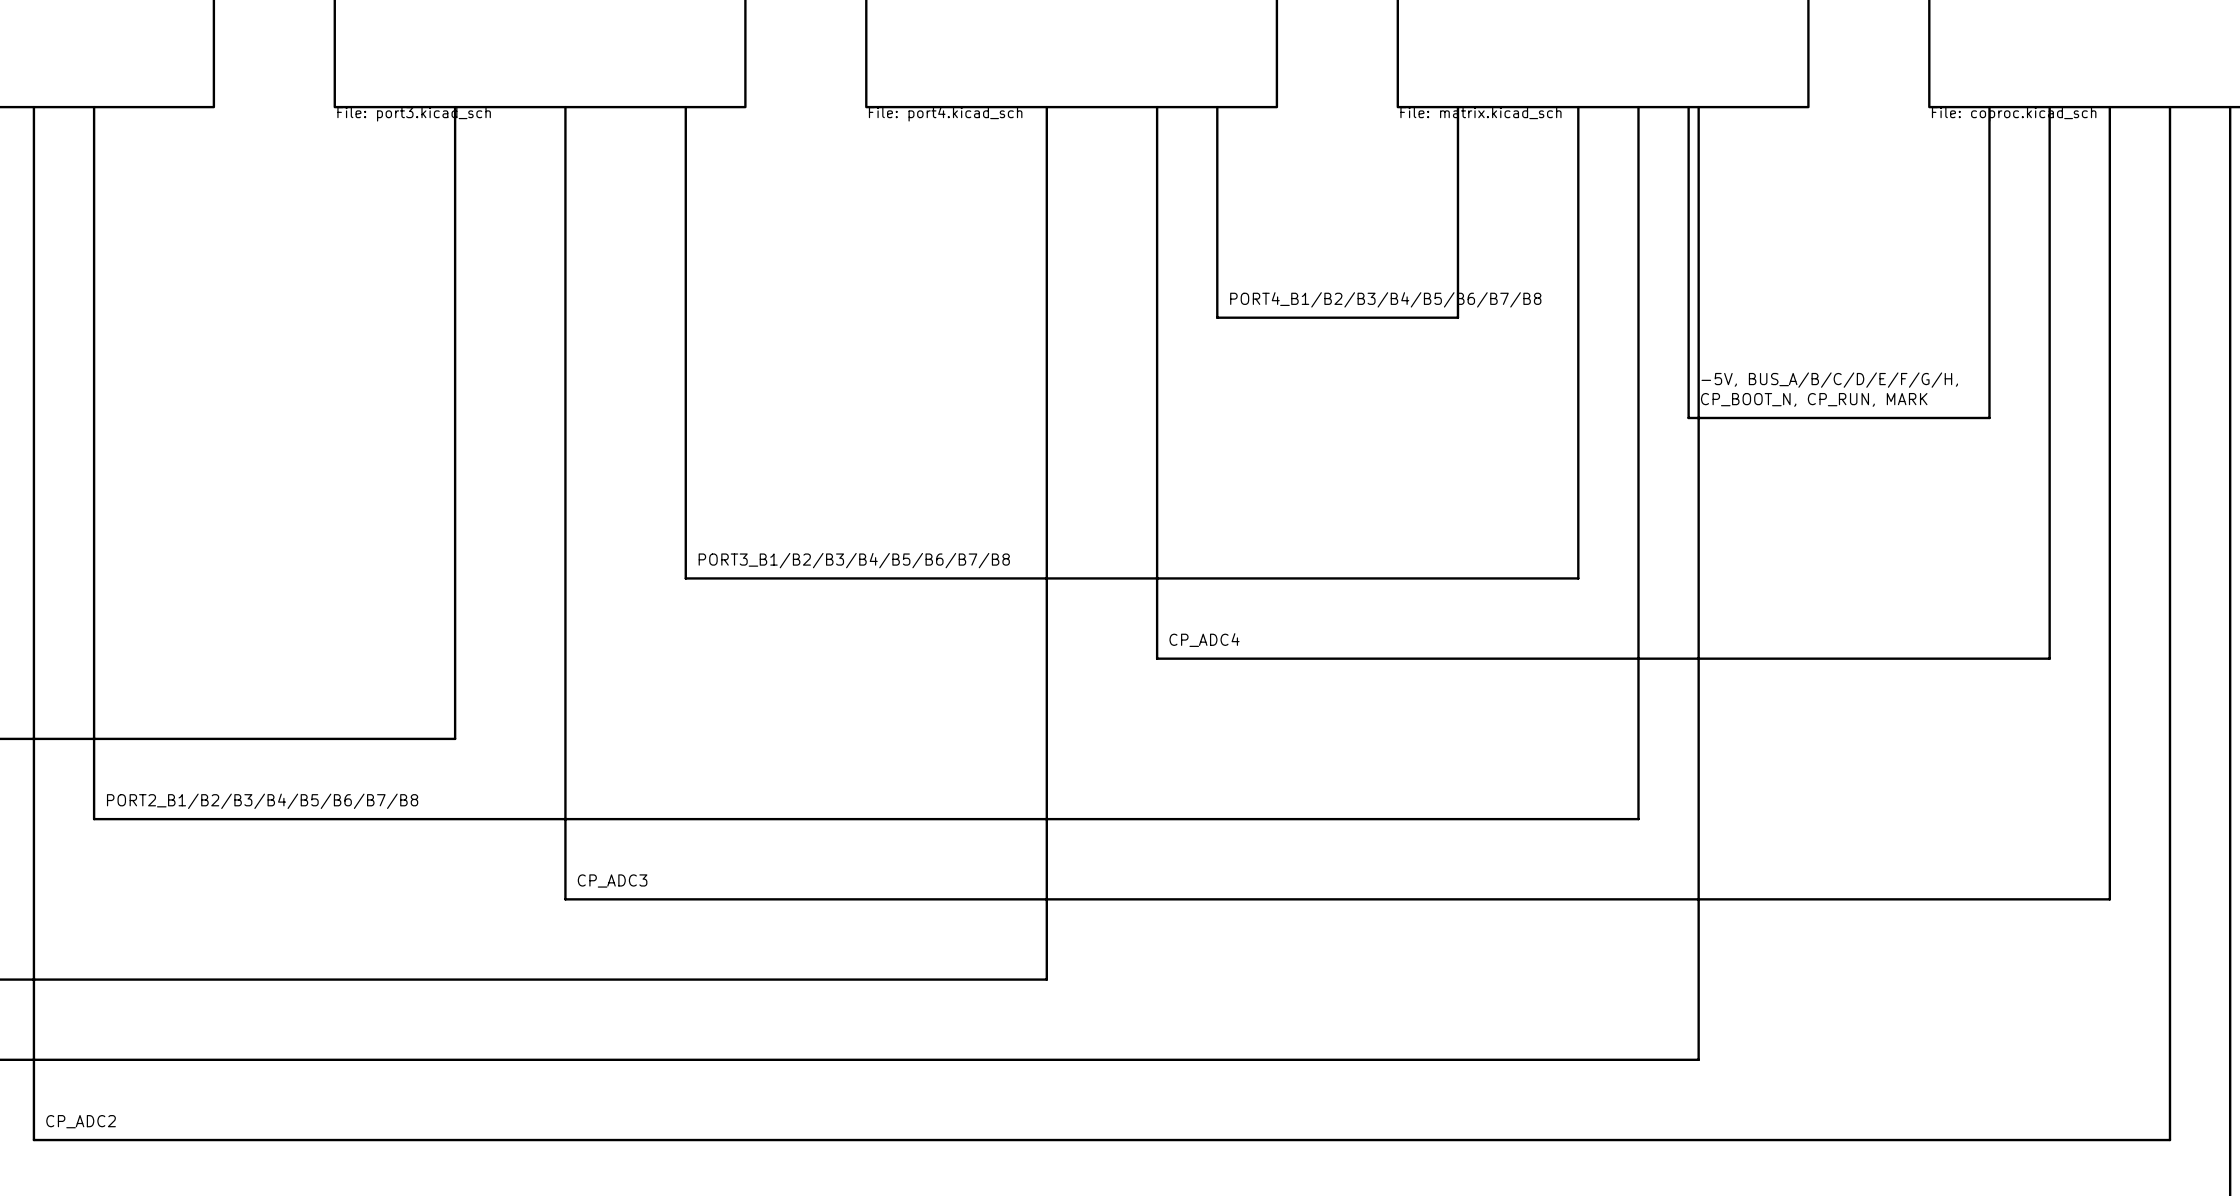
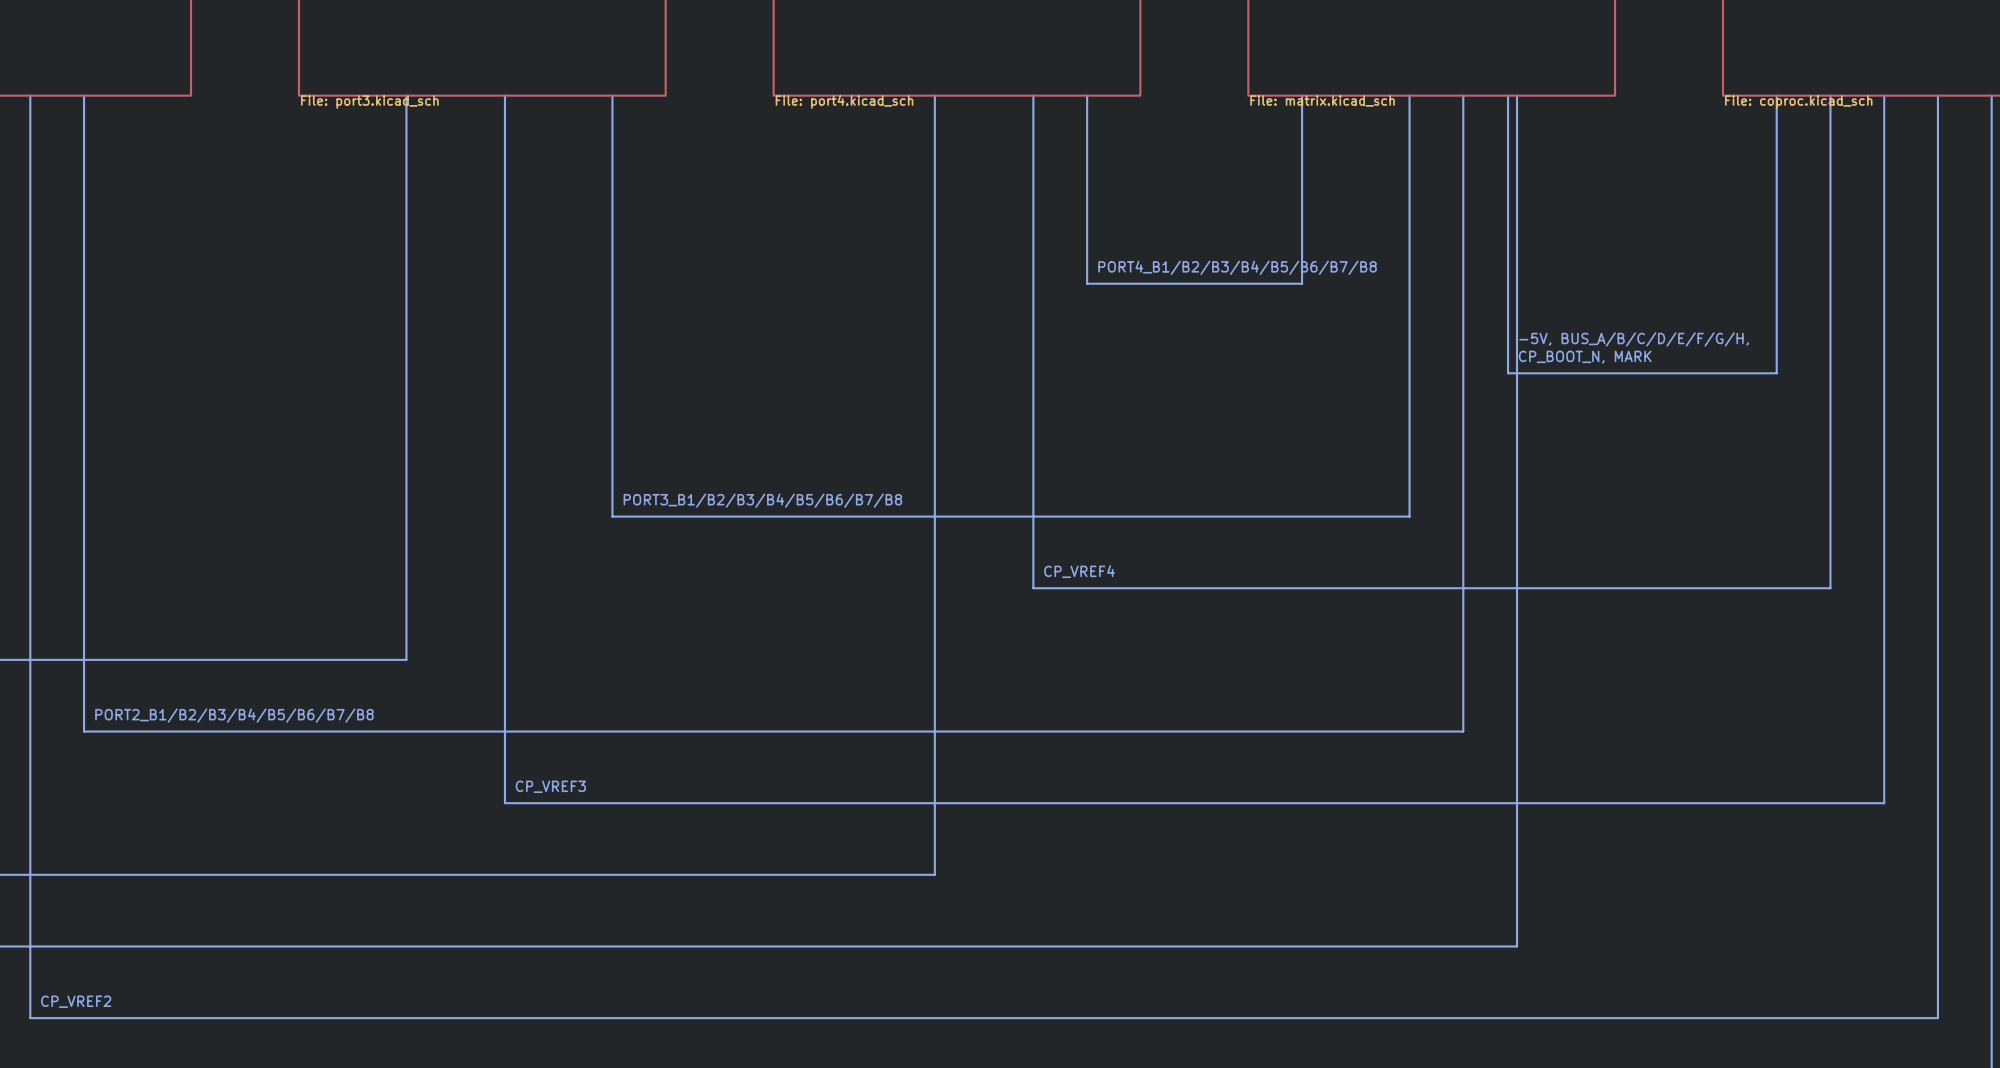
text: CP_BOOT_N, CP_RUN, MARK (1814, 399) -> CP_BOOT_N, MARK (1585, 357)
text: CP_ADC4 (1204, 640) -> CP_VREF4 (1079, 571)
text: CP_ADC3 (612, 881) -> CP_VREF3 (550, 786)
text: CP_ADC2 (81, 1121) -> CP_VREF2 (76, 1001)

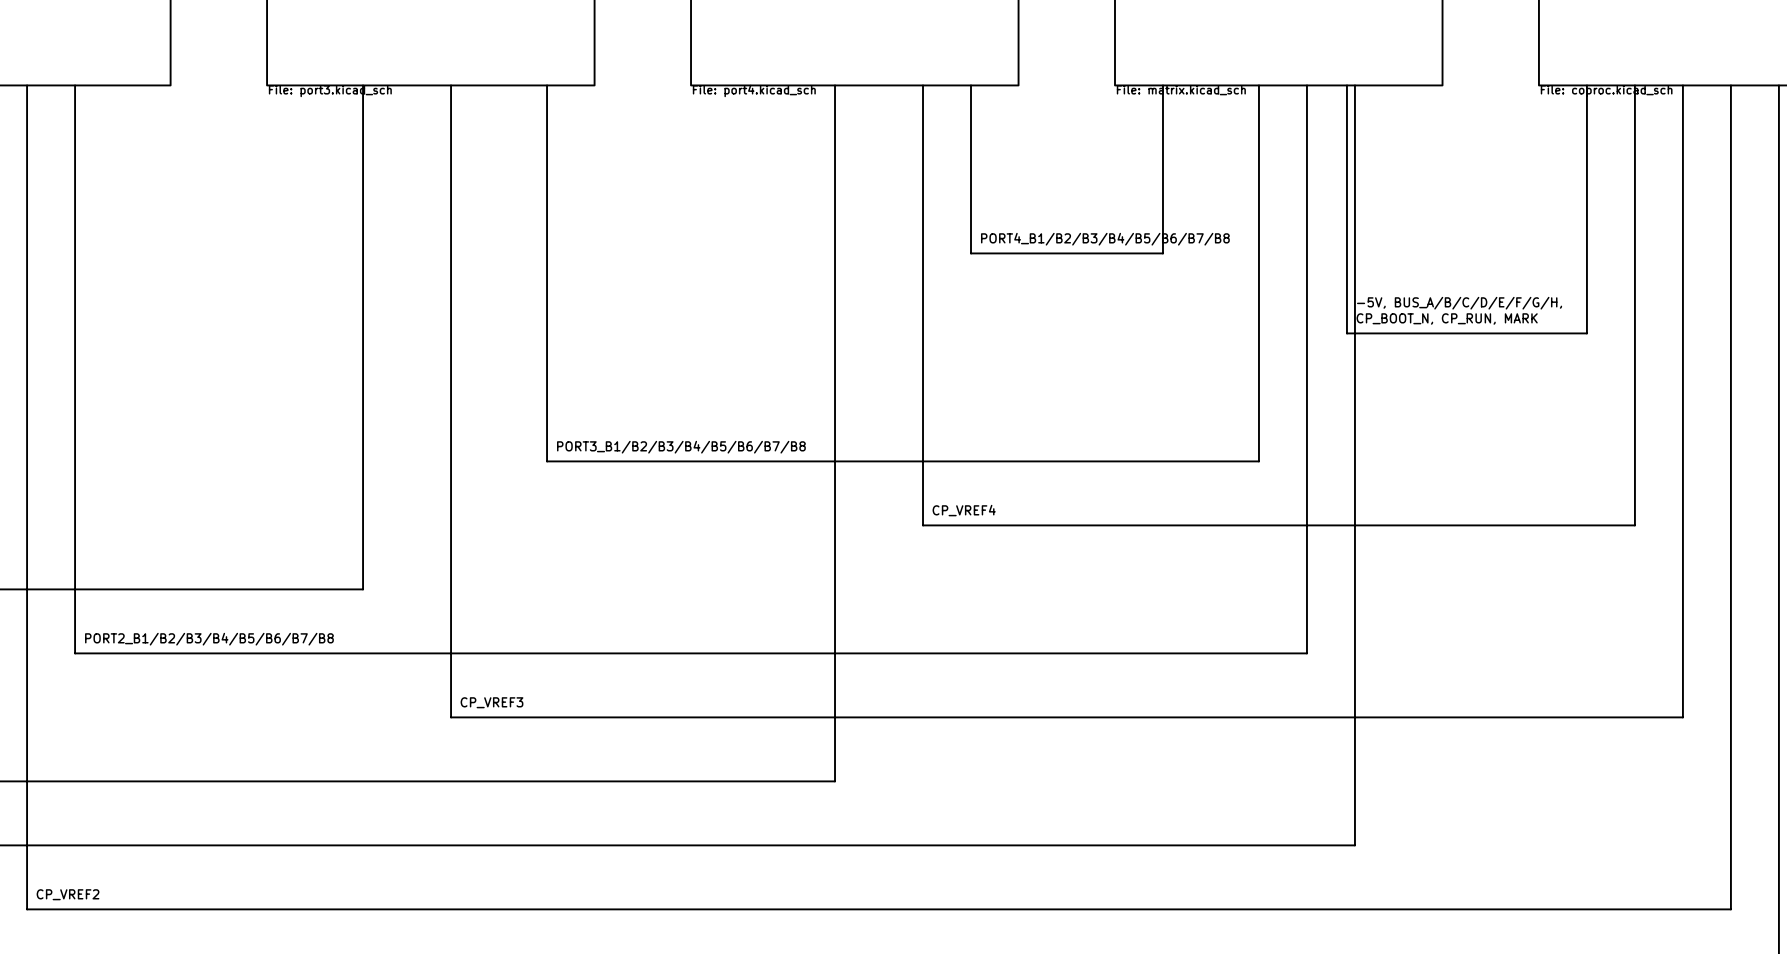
text: CP_BOOT_N, MARK (1585, 357) -> CP_BOOT_N, CP_RUN, MARK (1447, 318)

